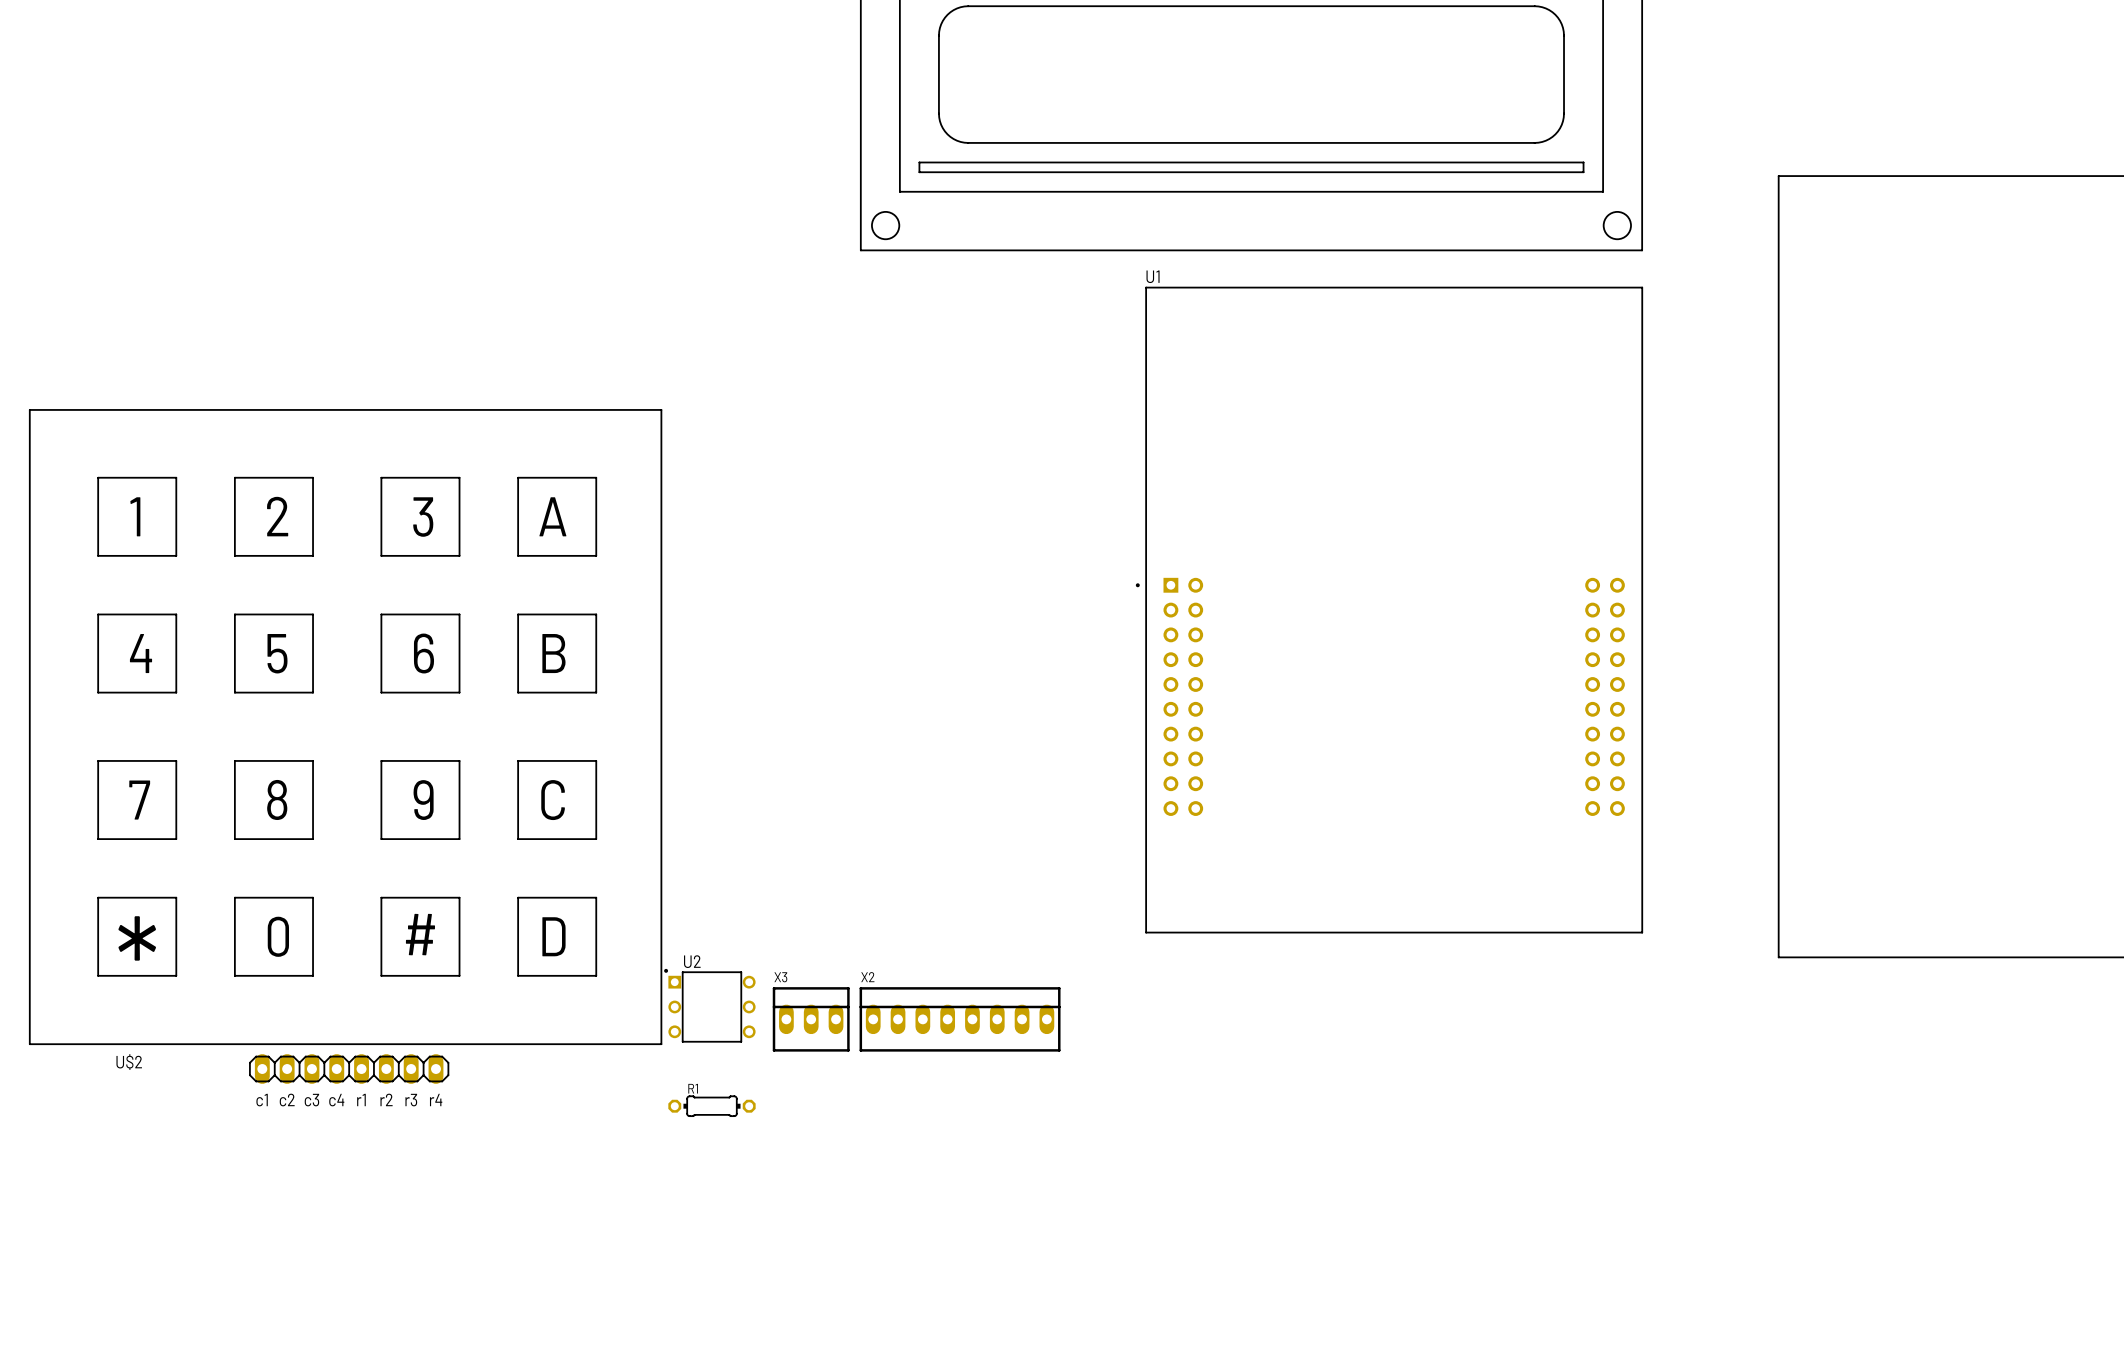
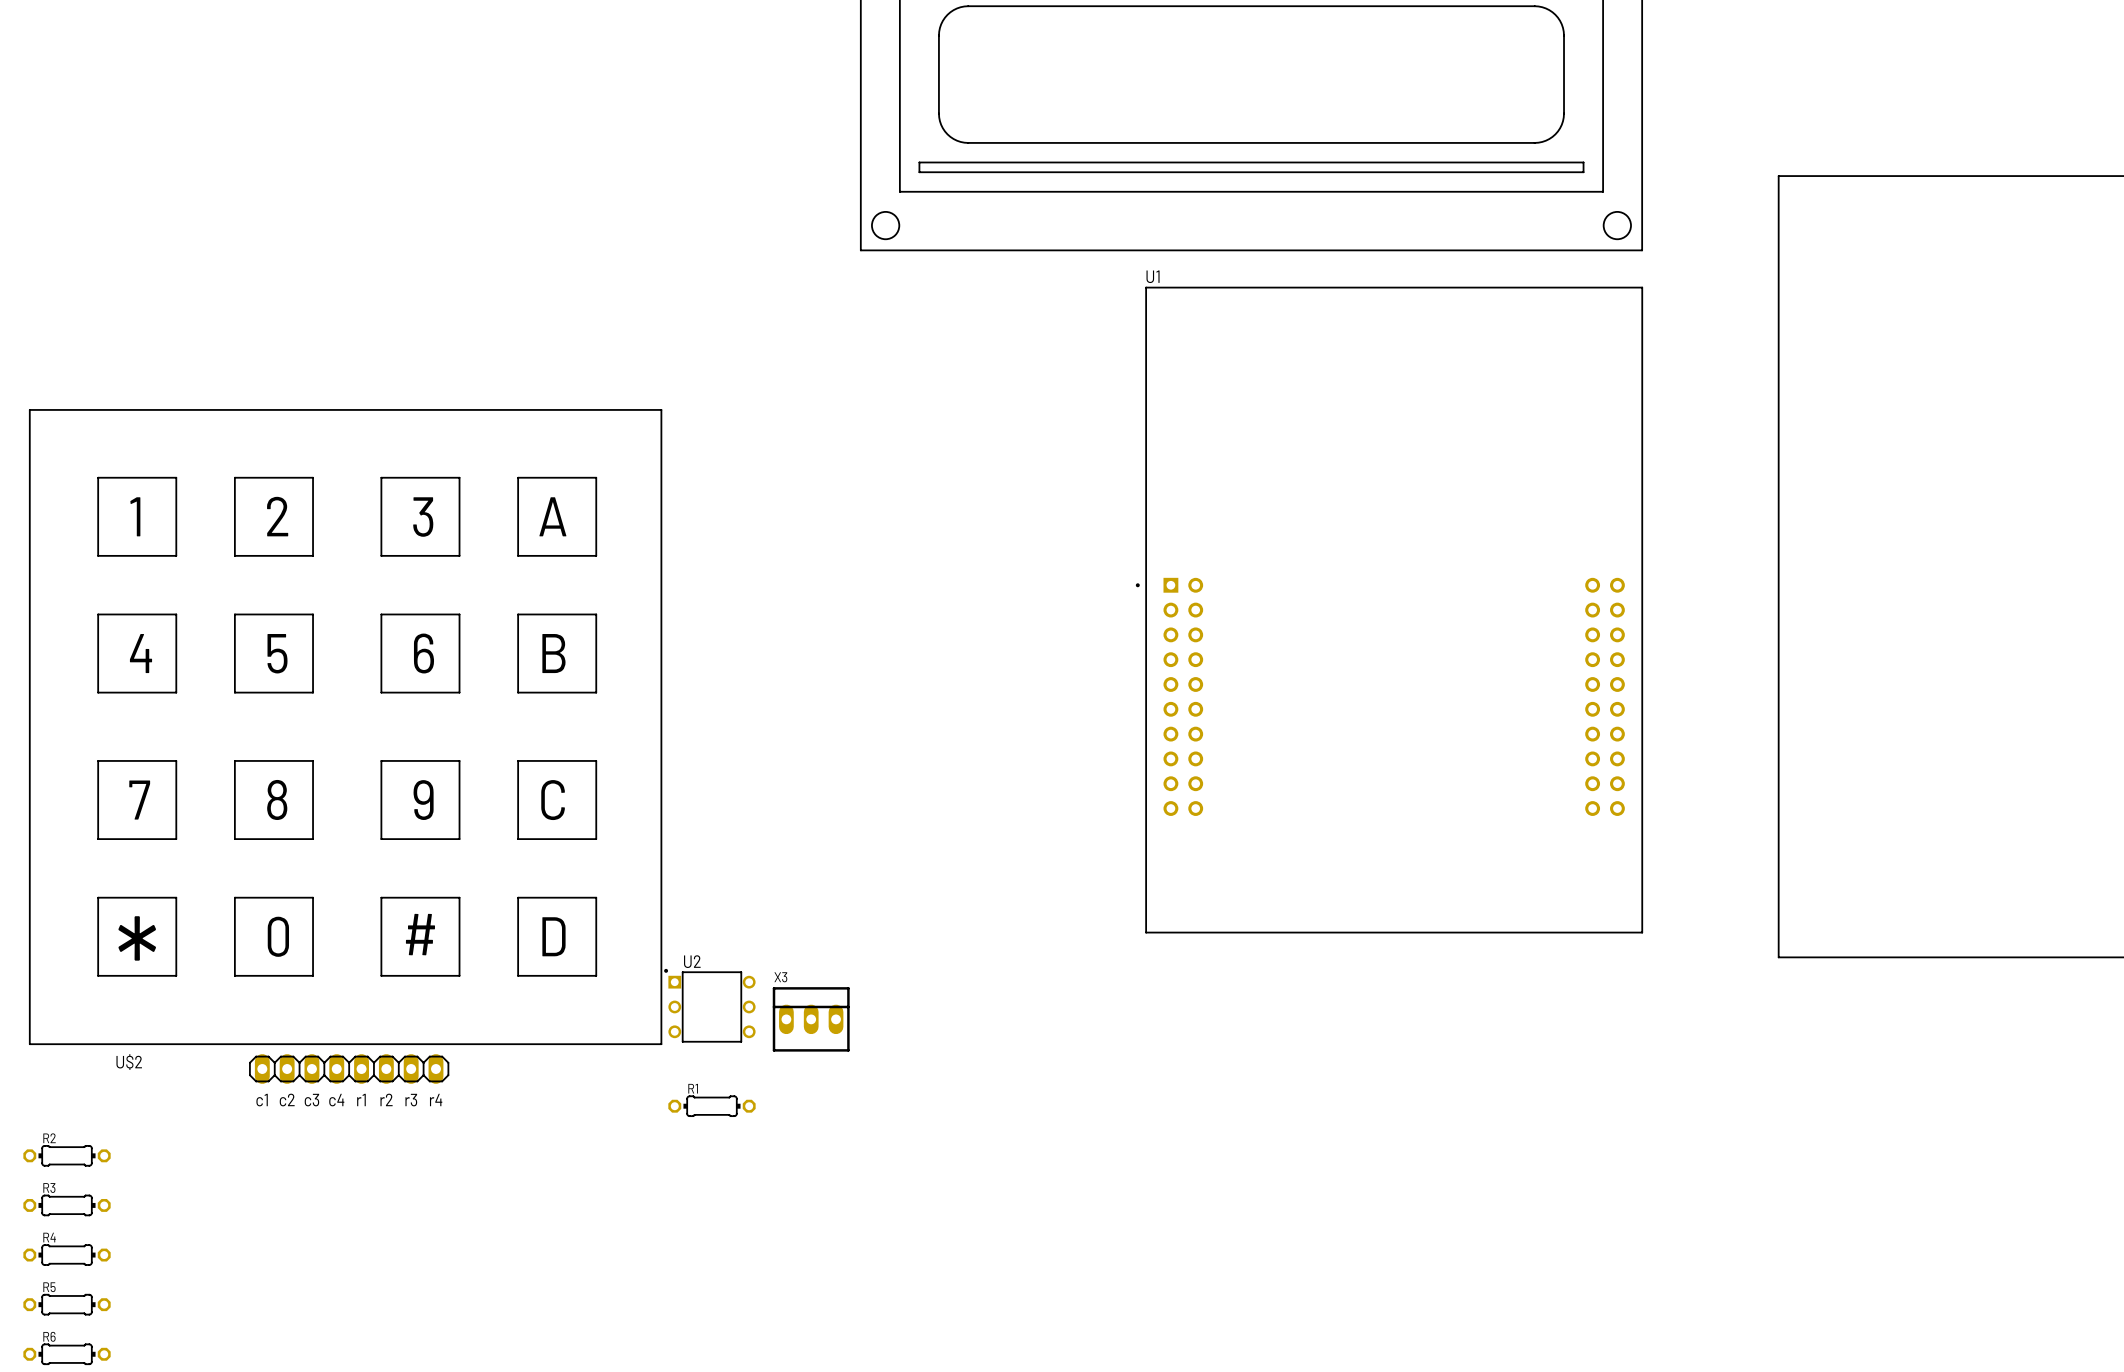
X2: (960, 1019) -> none
R2: none -> (67, 1155)
R3: none -> (67, 1205)
R4: none -> (67, 1255)
R5: none -> (67, 1304)
R6: none -> (67, 1354)

